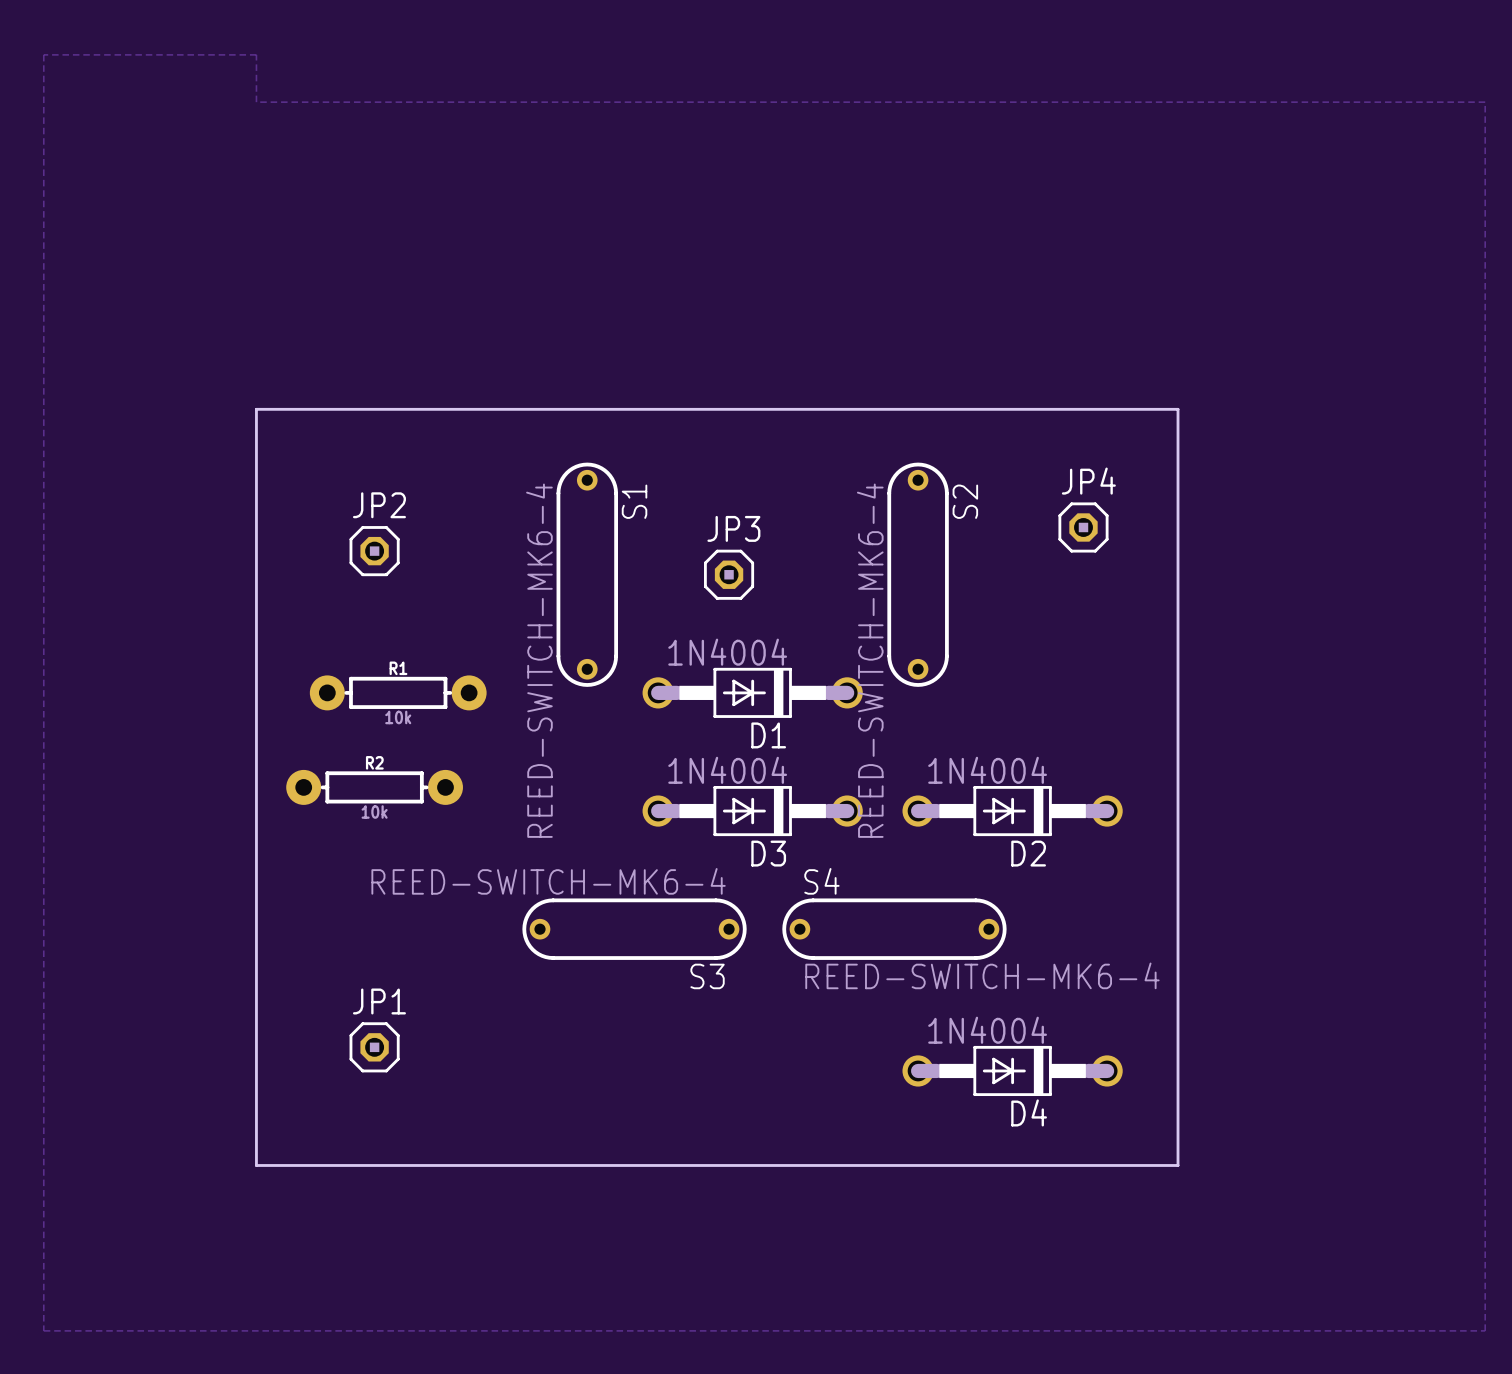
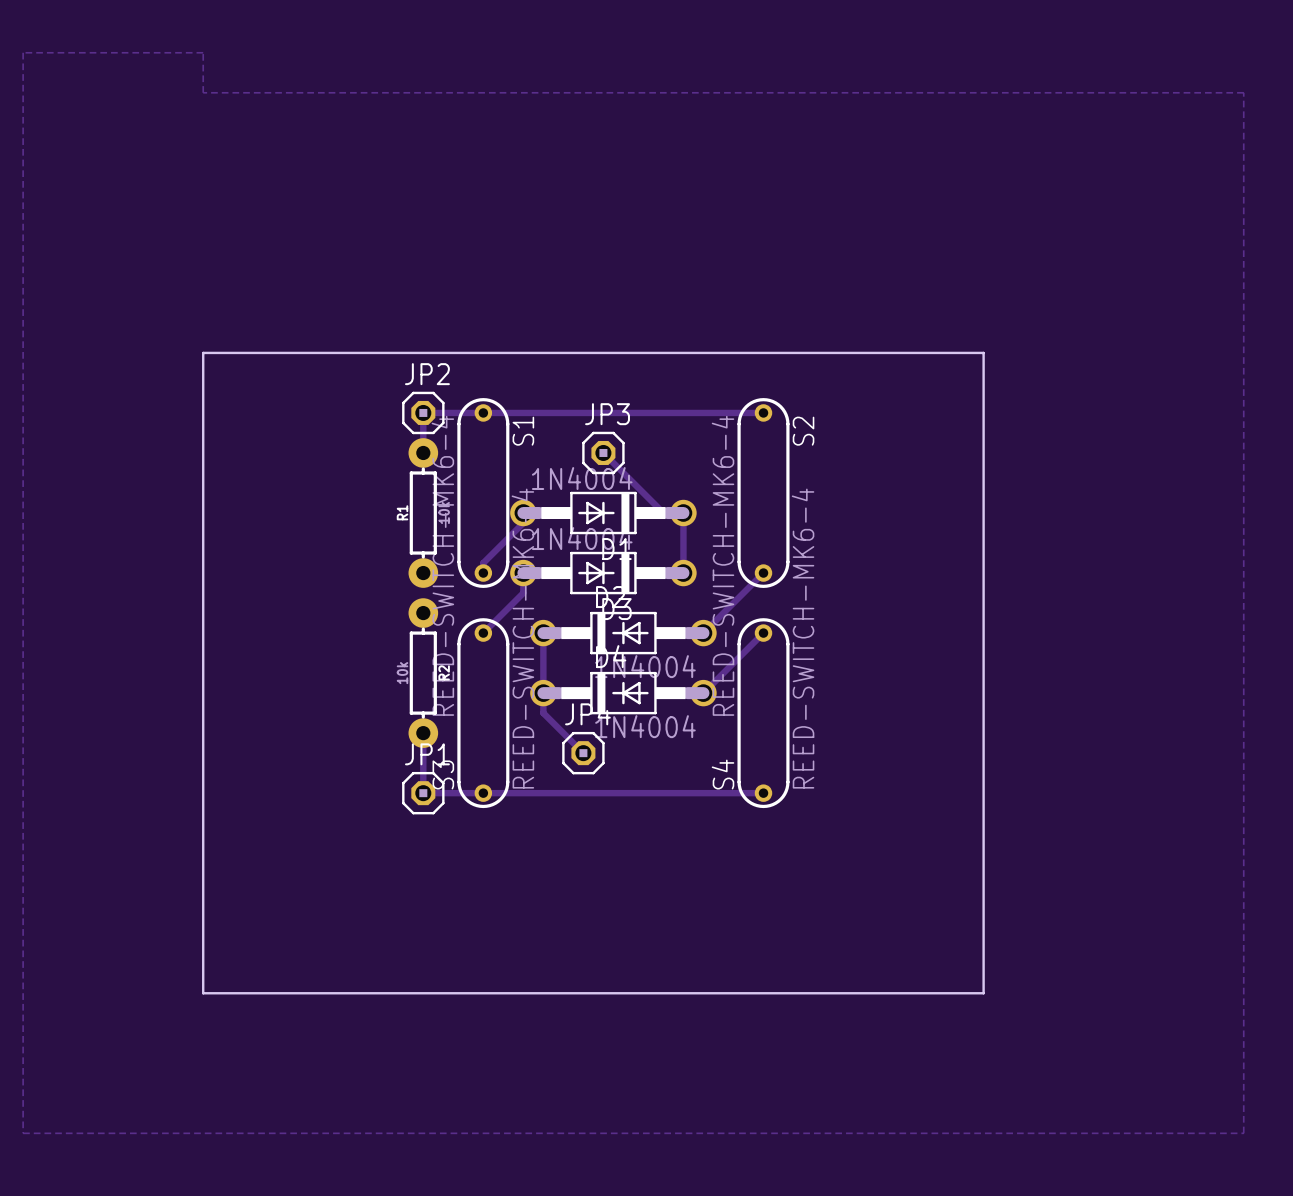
track: none -> (763, 412) (423, 412) (423, 452)
track: none -> (603, 452) (663, 513) (683, 513) (683, 573)
JP4 position: (1083, 527) -> (583, 753)
JP2 position: (374, 551) -> (423, 412)
JP3 position: (729, 574) -> (603, 452)
track: none -> (523, 513) (523, 523) (483, 563) (483, 573)
track: none -> (523, 573) (523, 593) (483, 633)
track: none -> (763, 573) (703, 633)
R1 rotation: 0° (398, 692) -> 90° clockwise (423, 513)
R1 position: (398, 692) -> (423, 513)
D1 position: (752, 692) -> (603, 513)
track: none -> (543, 633) (543, 713) (583, 753)
track: none -> (763, 633) (703, 693)
R2 rotation: 0° (374, 787) -> 90° clockwise (423, 673)
R2 position: (374, 787) -> (423, 673)
D3 position: (752, 811) -> (603, 573)
D2 rotation: 0° (1012, 811) -> 180° (623, 633)
D2 position: (1012, 811) -> (623, 633)
track: none -> (423, 733) (423, 793) (763, 793)
S4 name position: S4 (821, 881) -> S4 (723, 774)
S3 rotation: 0° (634, 929) -> 90° clockwise (483, 713)
S4 rotation: 0° (894, 929) -> 90° clockwise (763, 713)
S4 value position: REED-SWITCH-MK6-4 (982, 975) -> REED-SWITCH-MK6-4 (803, 638)
JP1 position: (374, 1047) -> (423, 793)
D4 rotation: 0° (1012, 1070) -> 180° (623, 693)
D4 position: (1012, 1070) -> (623, 693)

